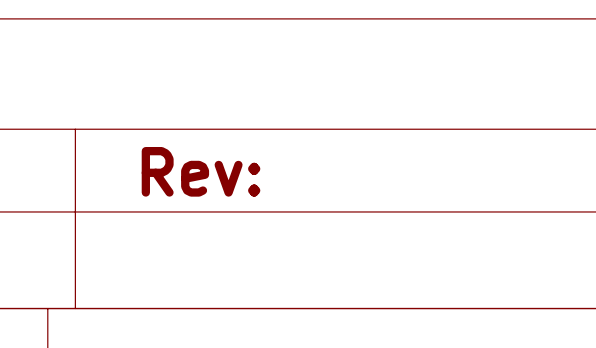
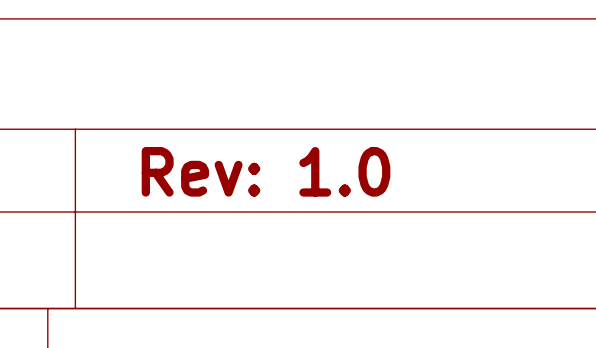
title block: Rev: (201, 171) -> Rev: 1.0 (266, 171)

